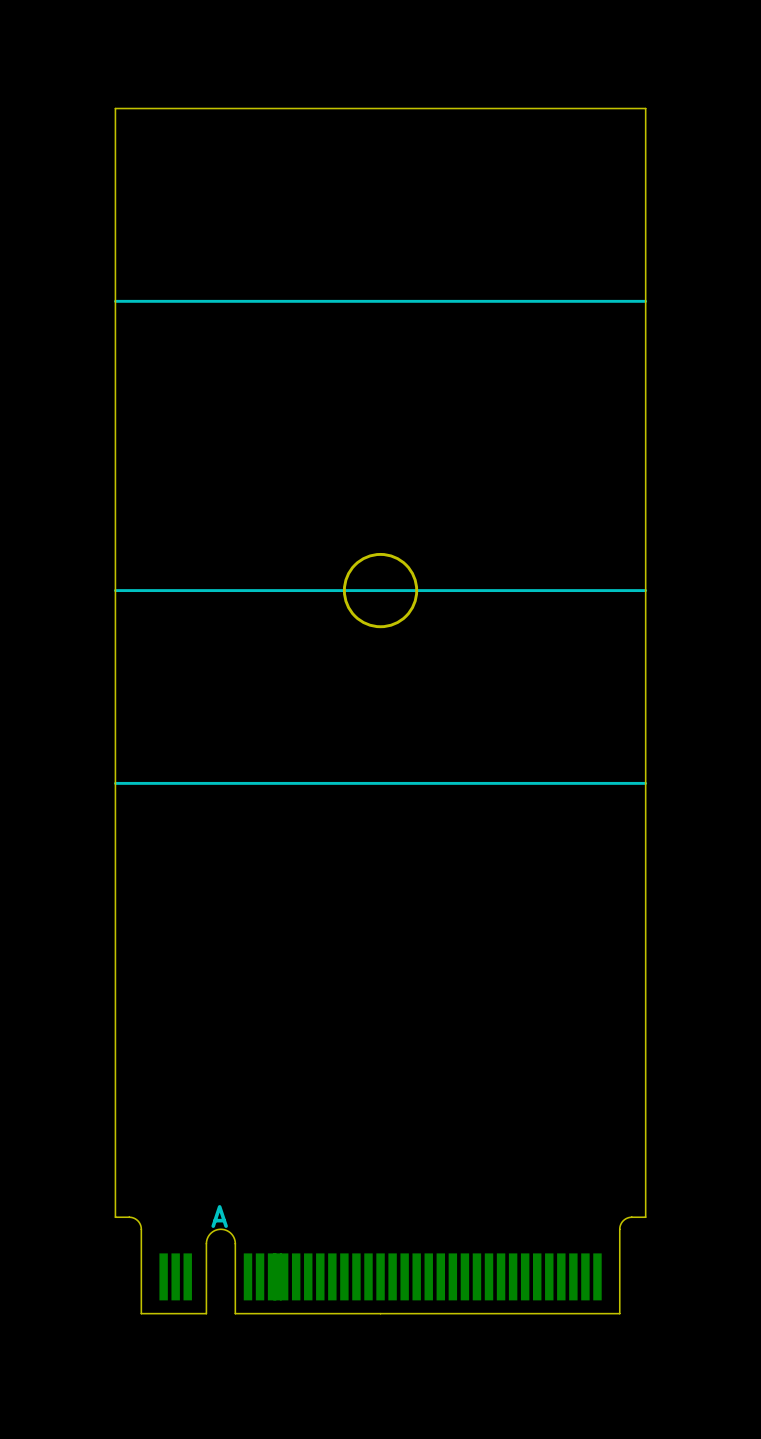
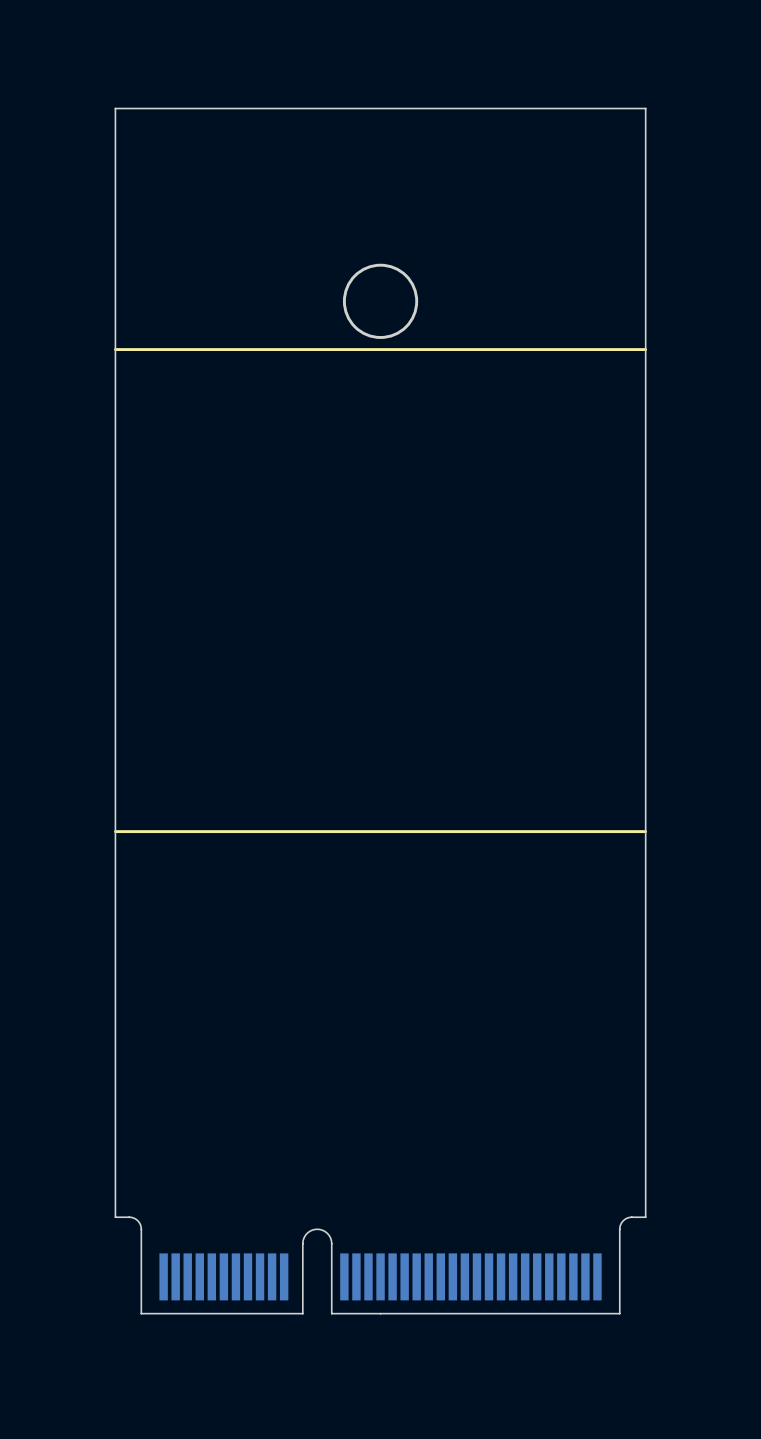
drawing shape: [113, 107, 648, 1218] -> [113, 107, 648, 1218]
part footprint: [114, 1216, 647, 1315] -> [114, 1216, 647, 1315]

